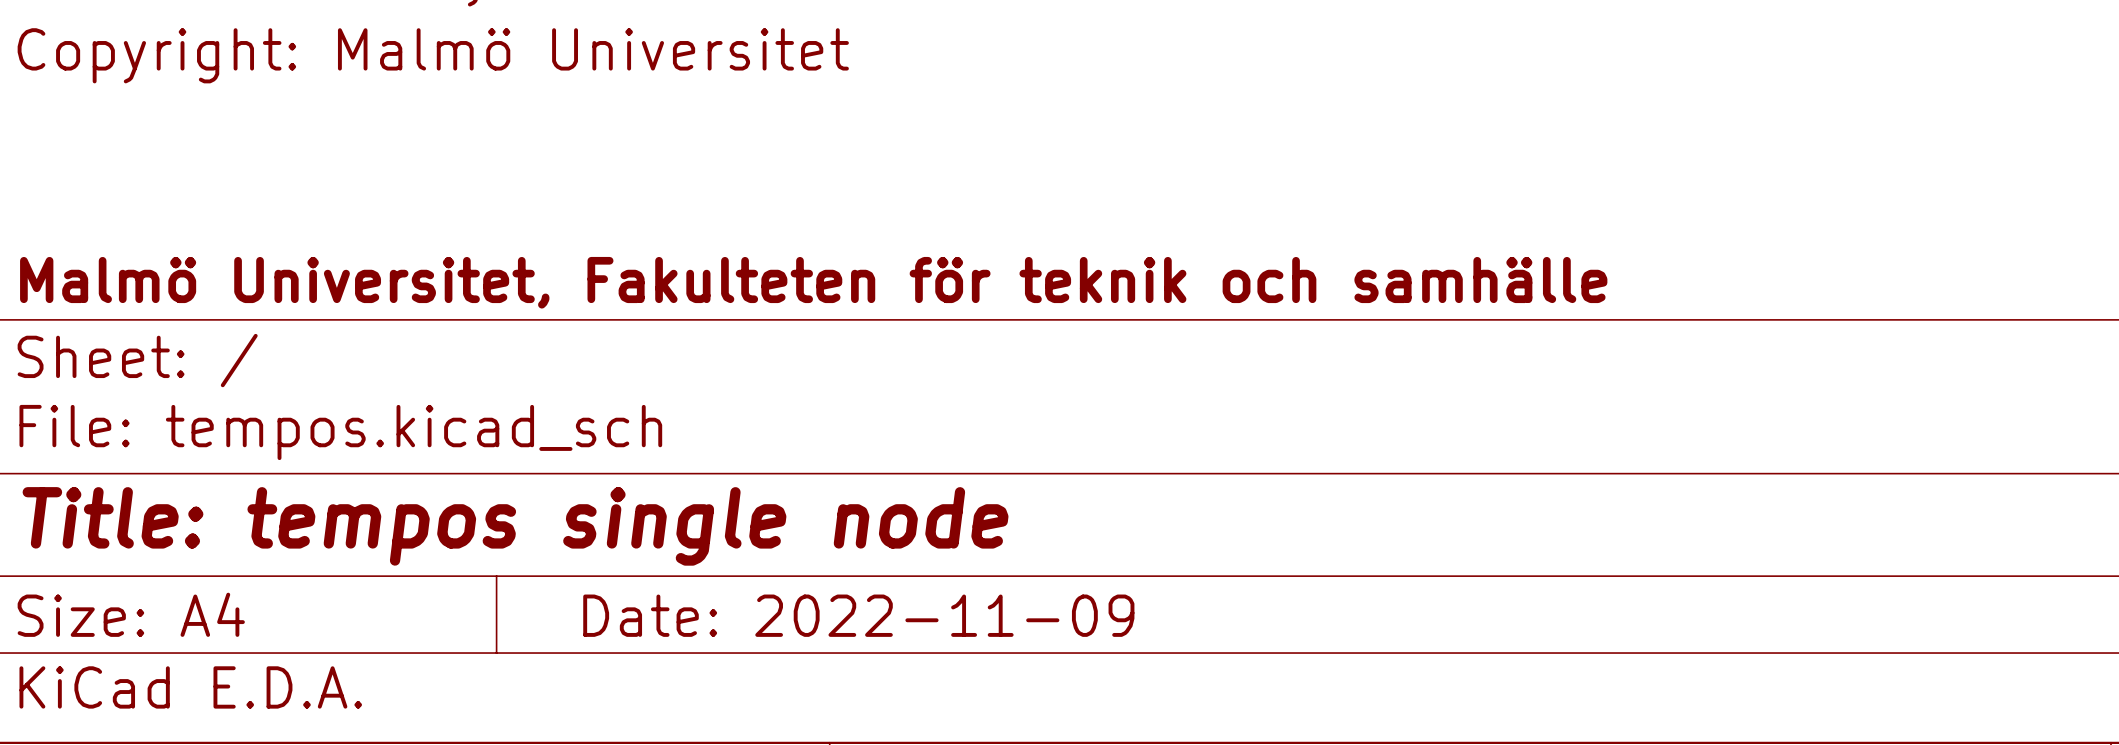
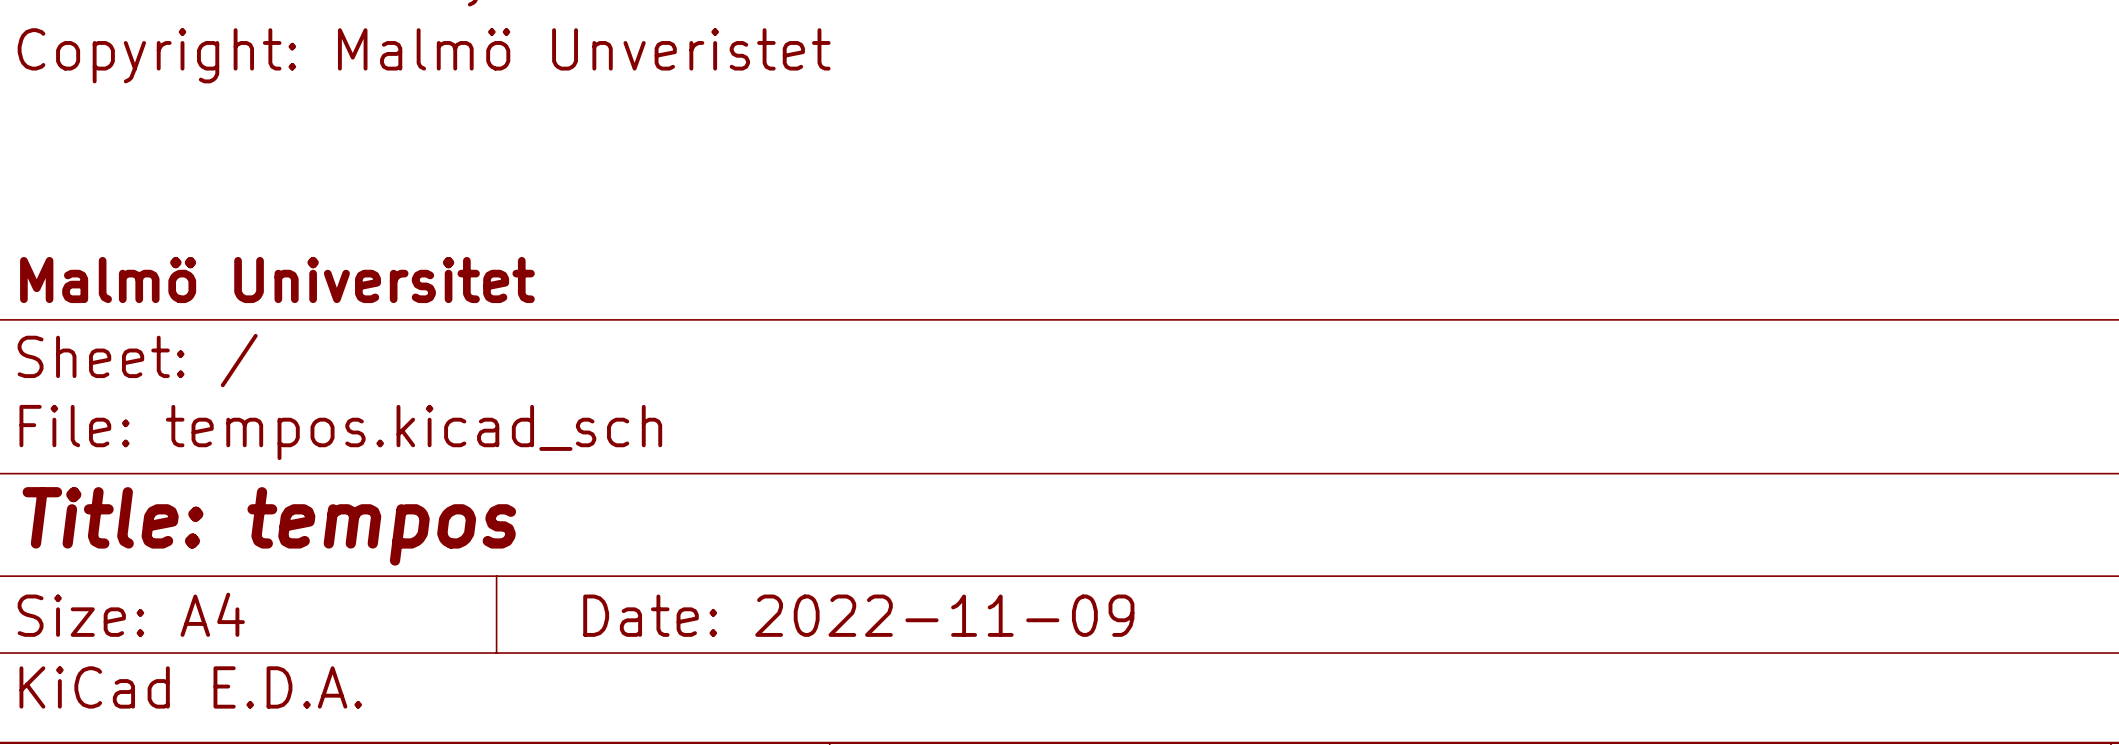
title block: Copyright: Malmö Universitet (433, 55) -> Copyright: Malmö Unveristet (424, 55)
title block: Malmö Universitet, Fakulteten för teknik och samhälle (813, 282) -> Malmö Universitet (277, 280)
title block: Title: tempos single node (515, 526) -> Title: tempos (269, 526)

